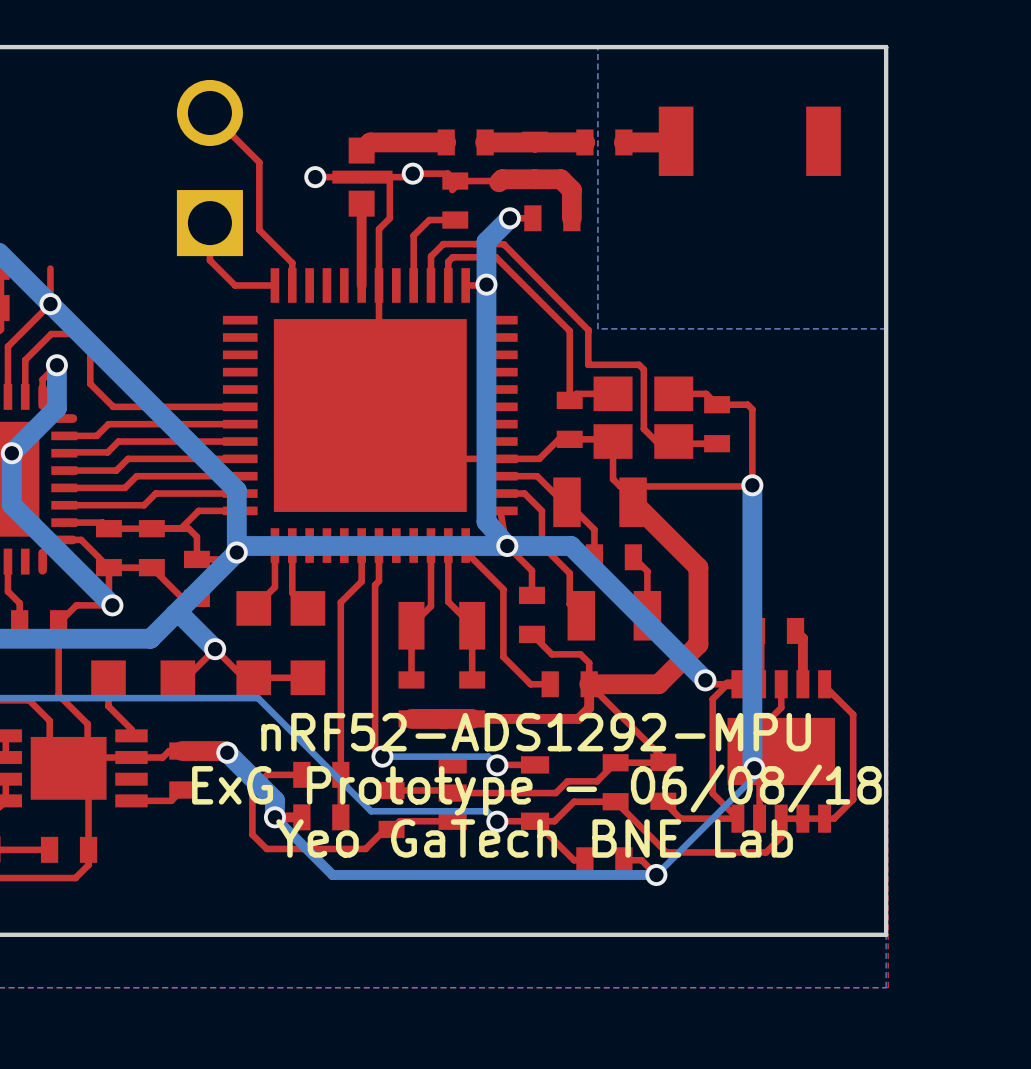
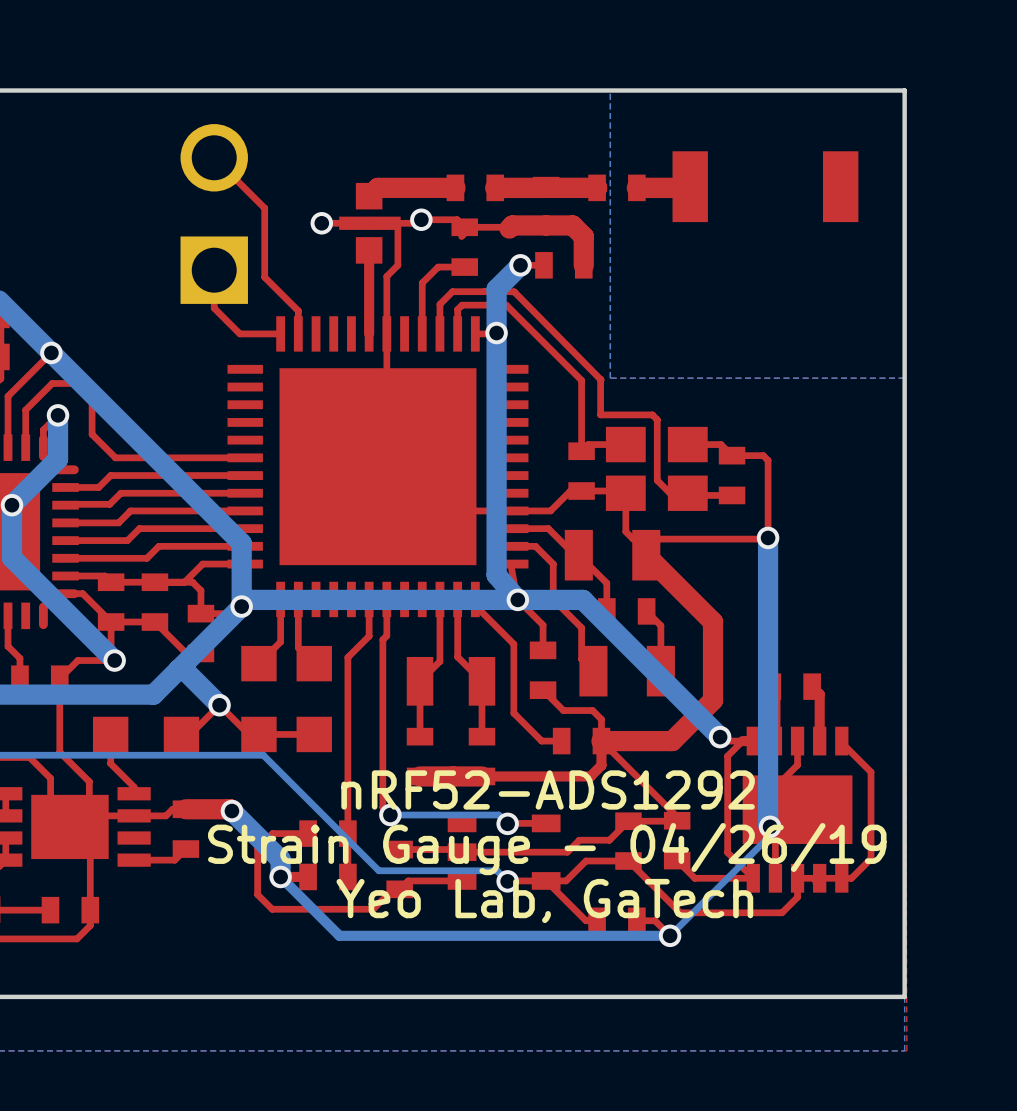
top track: (50, 268) (50, 301) -> none
text: nRF52-ADS1292-MPU (536, 732) -> nRF52-ADS1292 (548, 789)
text: ExG Prototype - 06/08/18 (536, 790) -> Strain Gauge - 04/26/19 (547, 849)
text: Yeo GaTech BNE Lab (534, 838) -> Yeo Lab, GaTech (544, 900)

